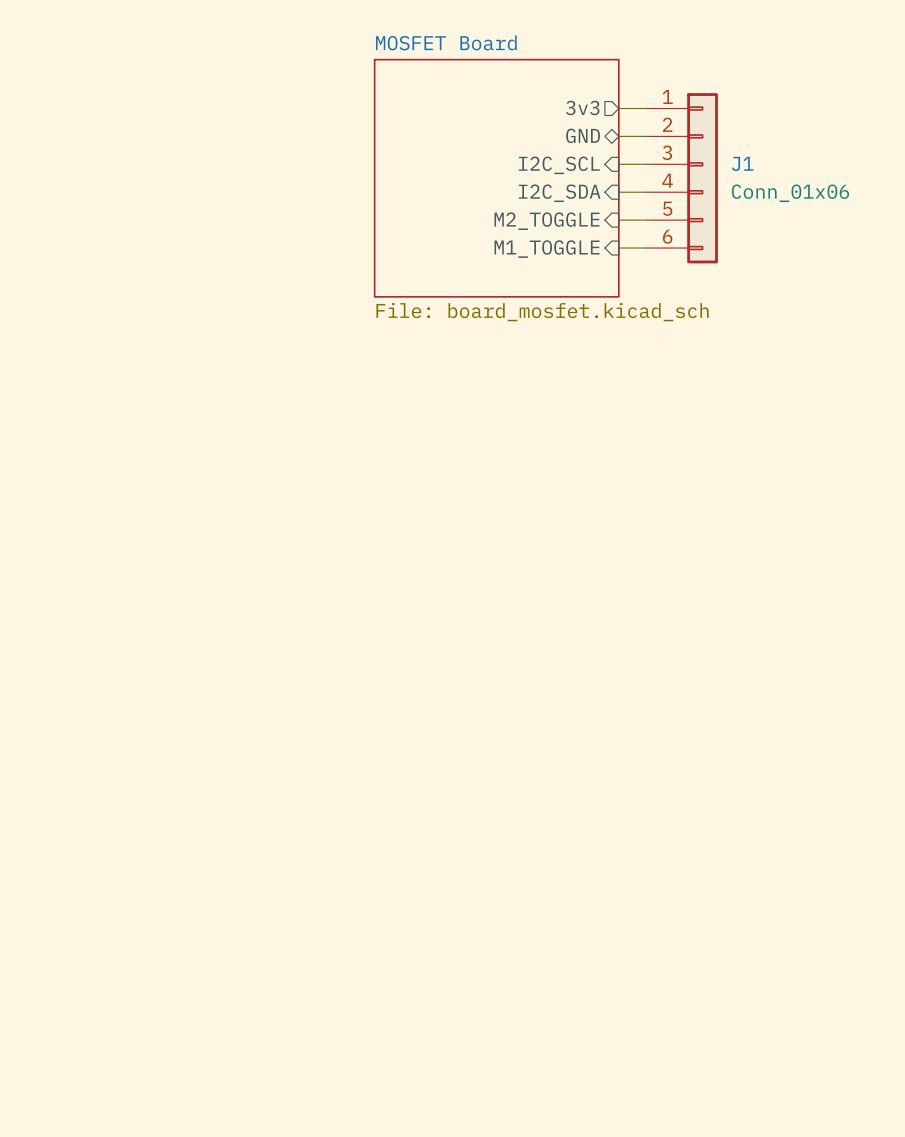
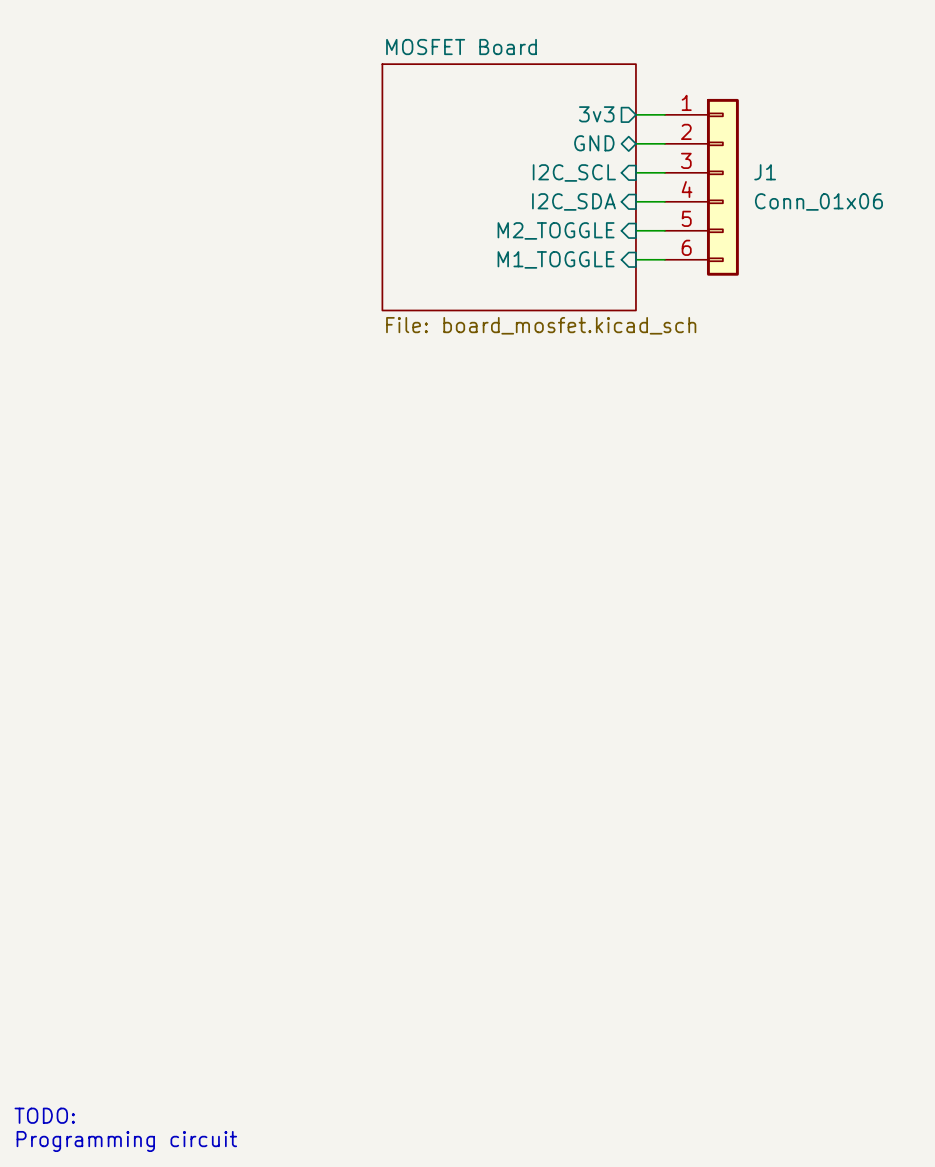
text: none -> TODO: (44, 1115)
text: none -> Programming circuit (126, 1141)

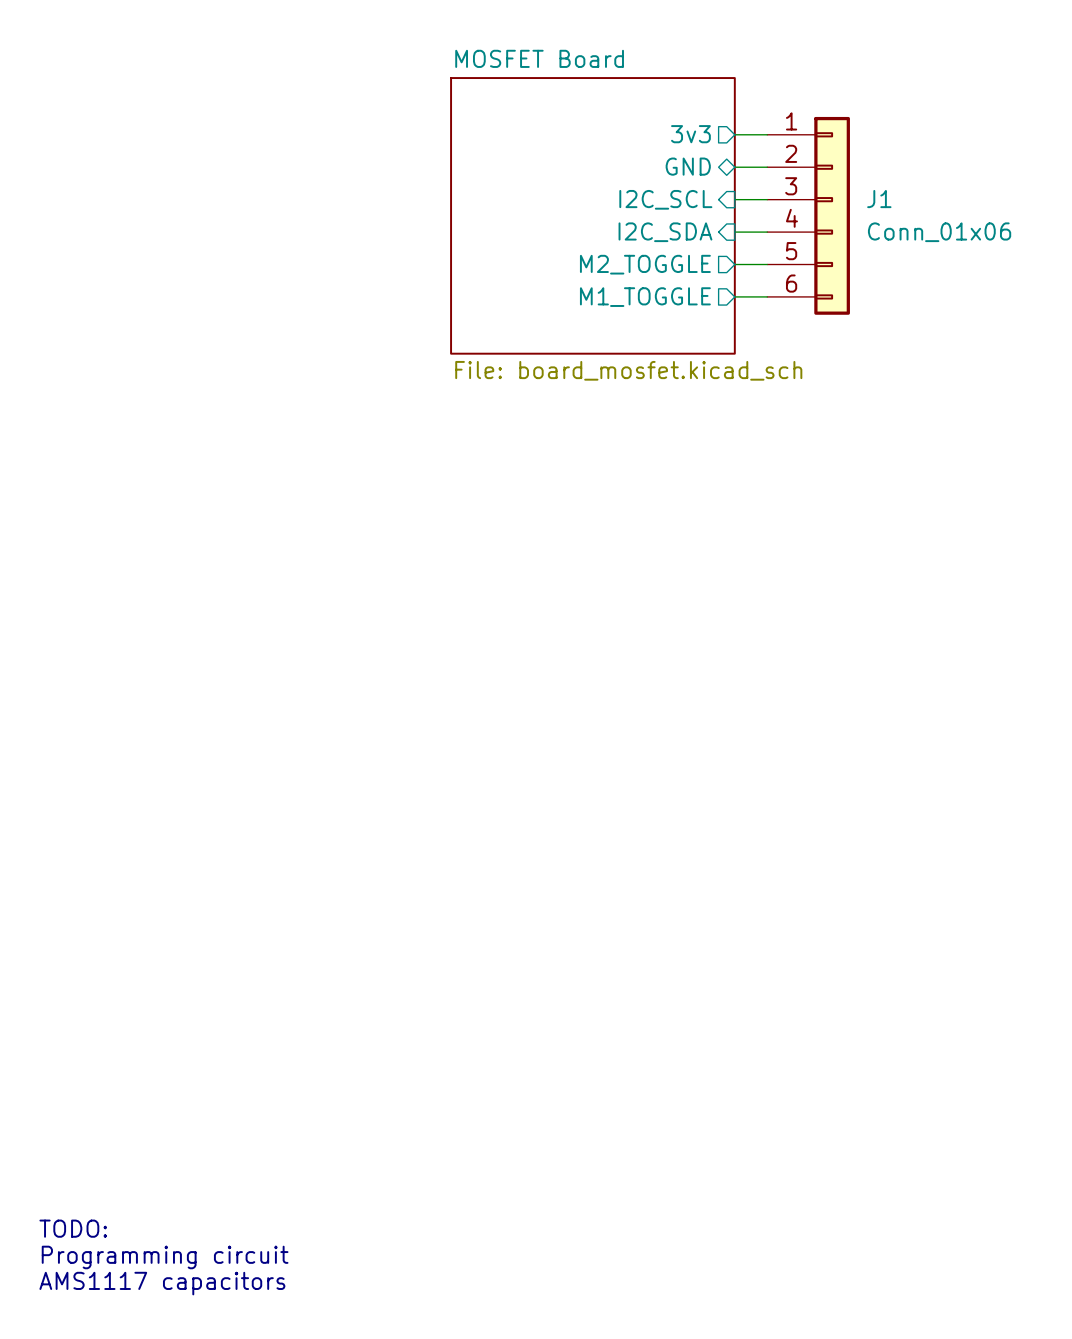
sheet pin shape: input (556, 230) -> output (645, 264)
sheet pin shape: input (556, 259) -> output (645, 297)
text: none -> TODO: (73, 1228)
text: TODO: (44, 1115) -> Programming circuit (165, 1257)
text: Programming circuit (126, 1141) -> AMS1117 capacitors (162, 1283)

